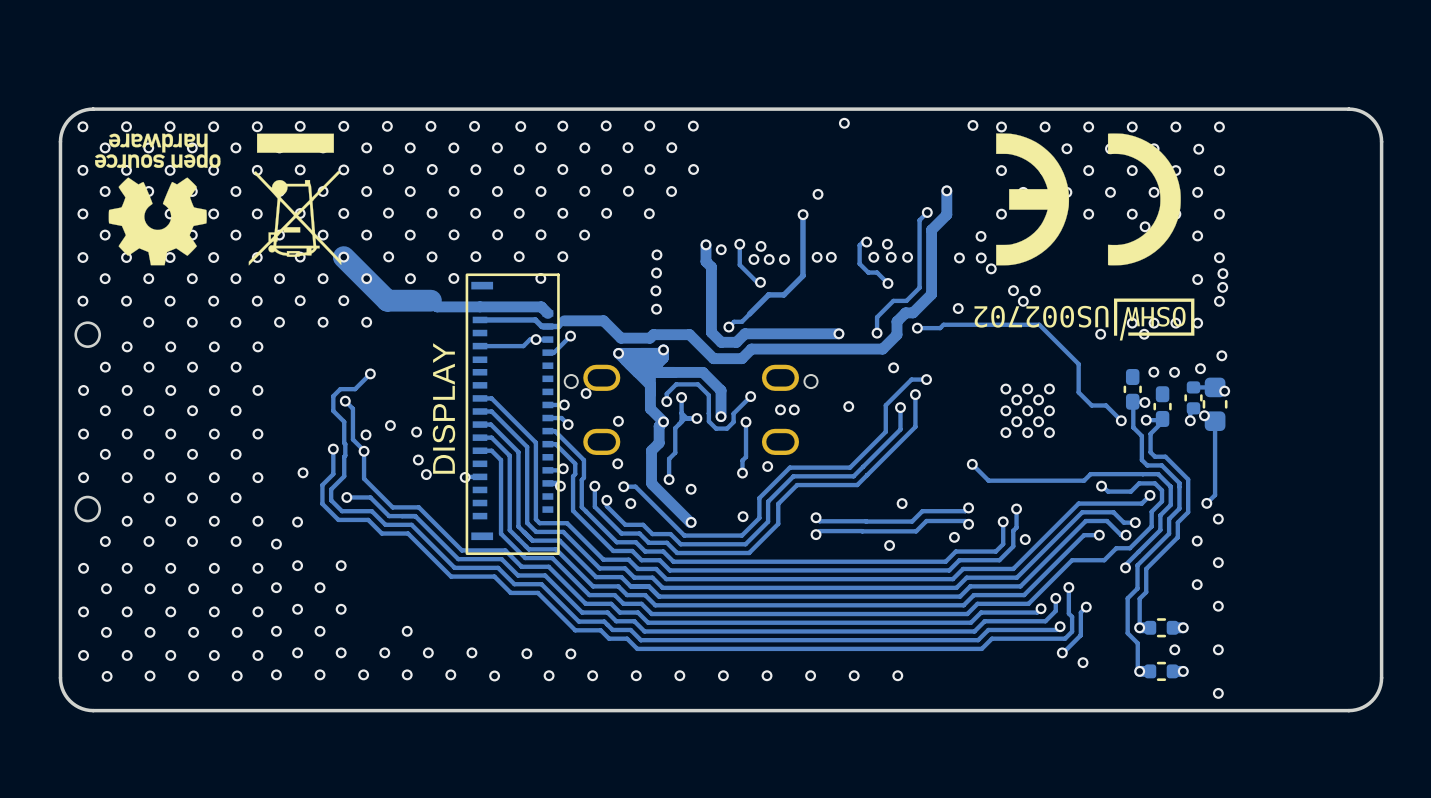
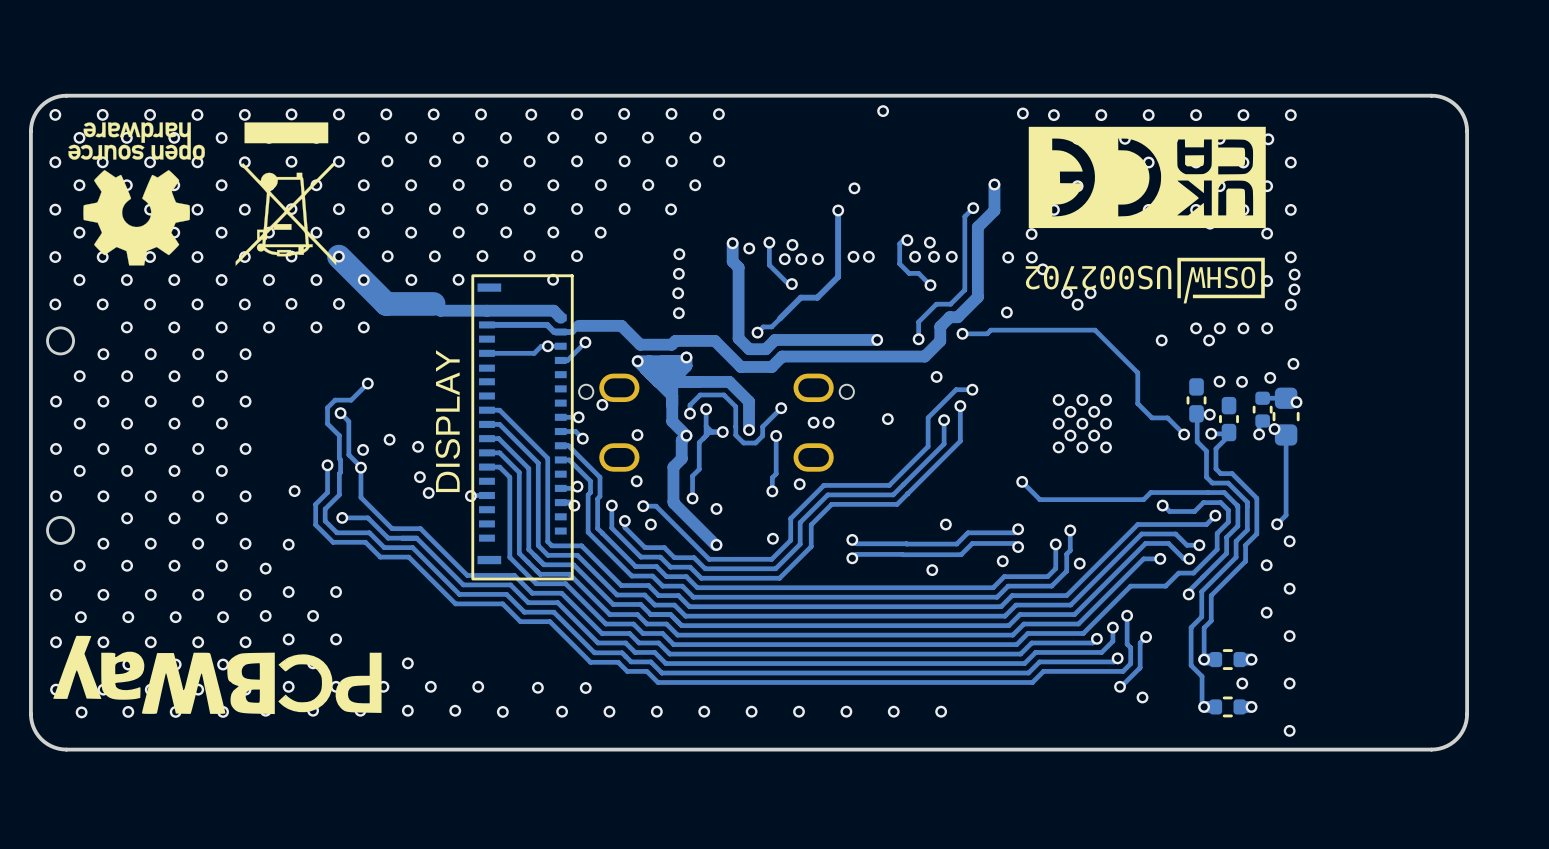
drawing shape: [996, 133, 1181, 266] -> [1028, 126, 1266, 229]
drawing position: (1084, 319) -> (1145, 280)
drawing: none -> [53, 635, 382, 715]

